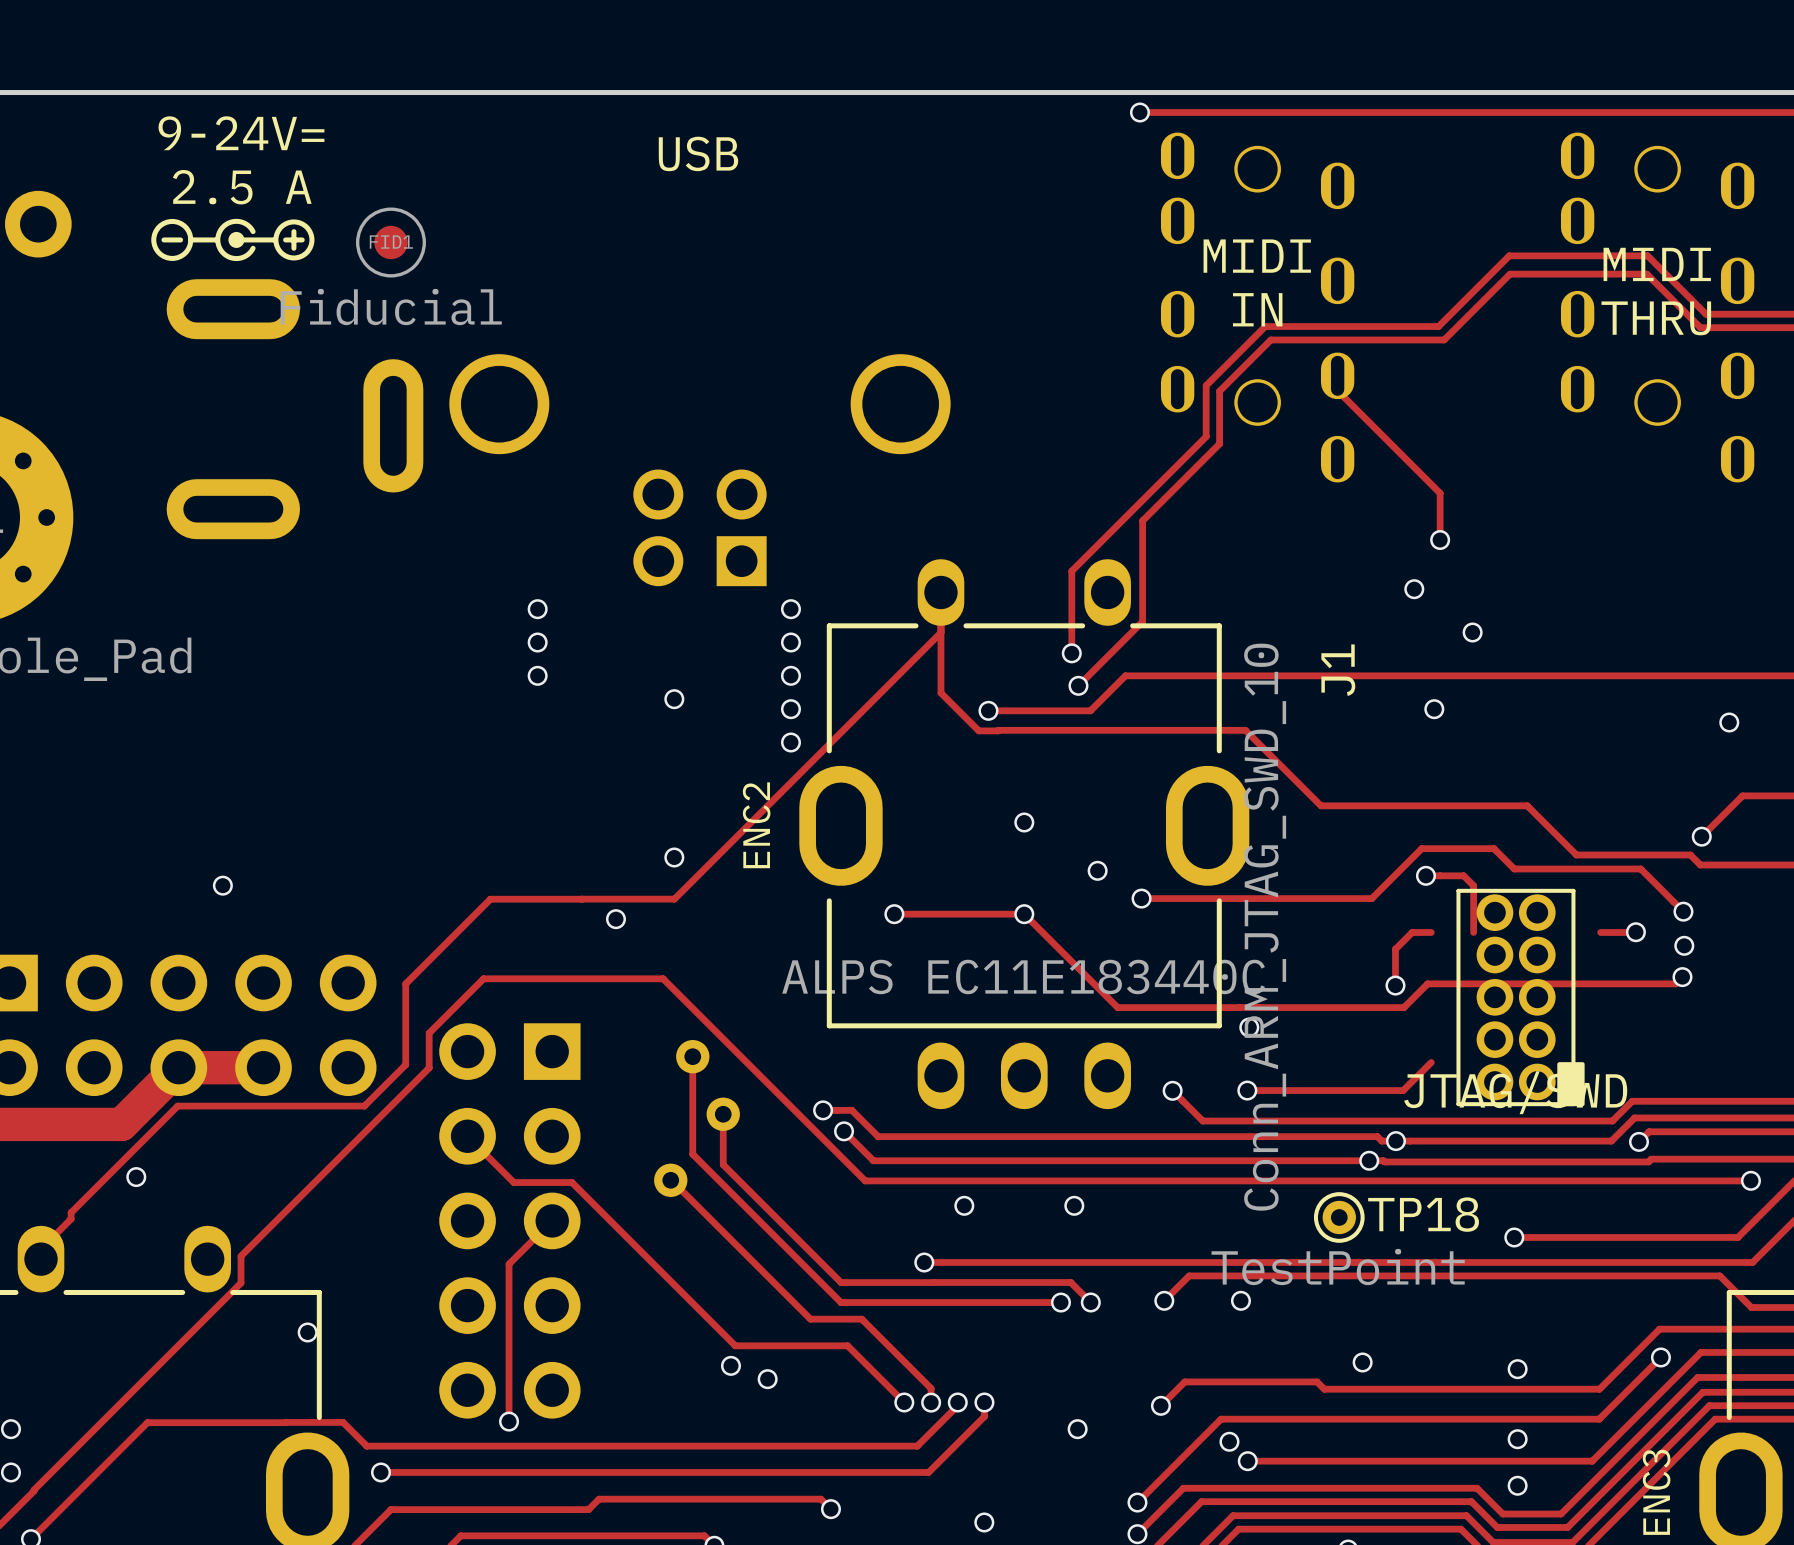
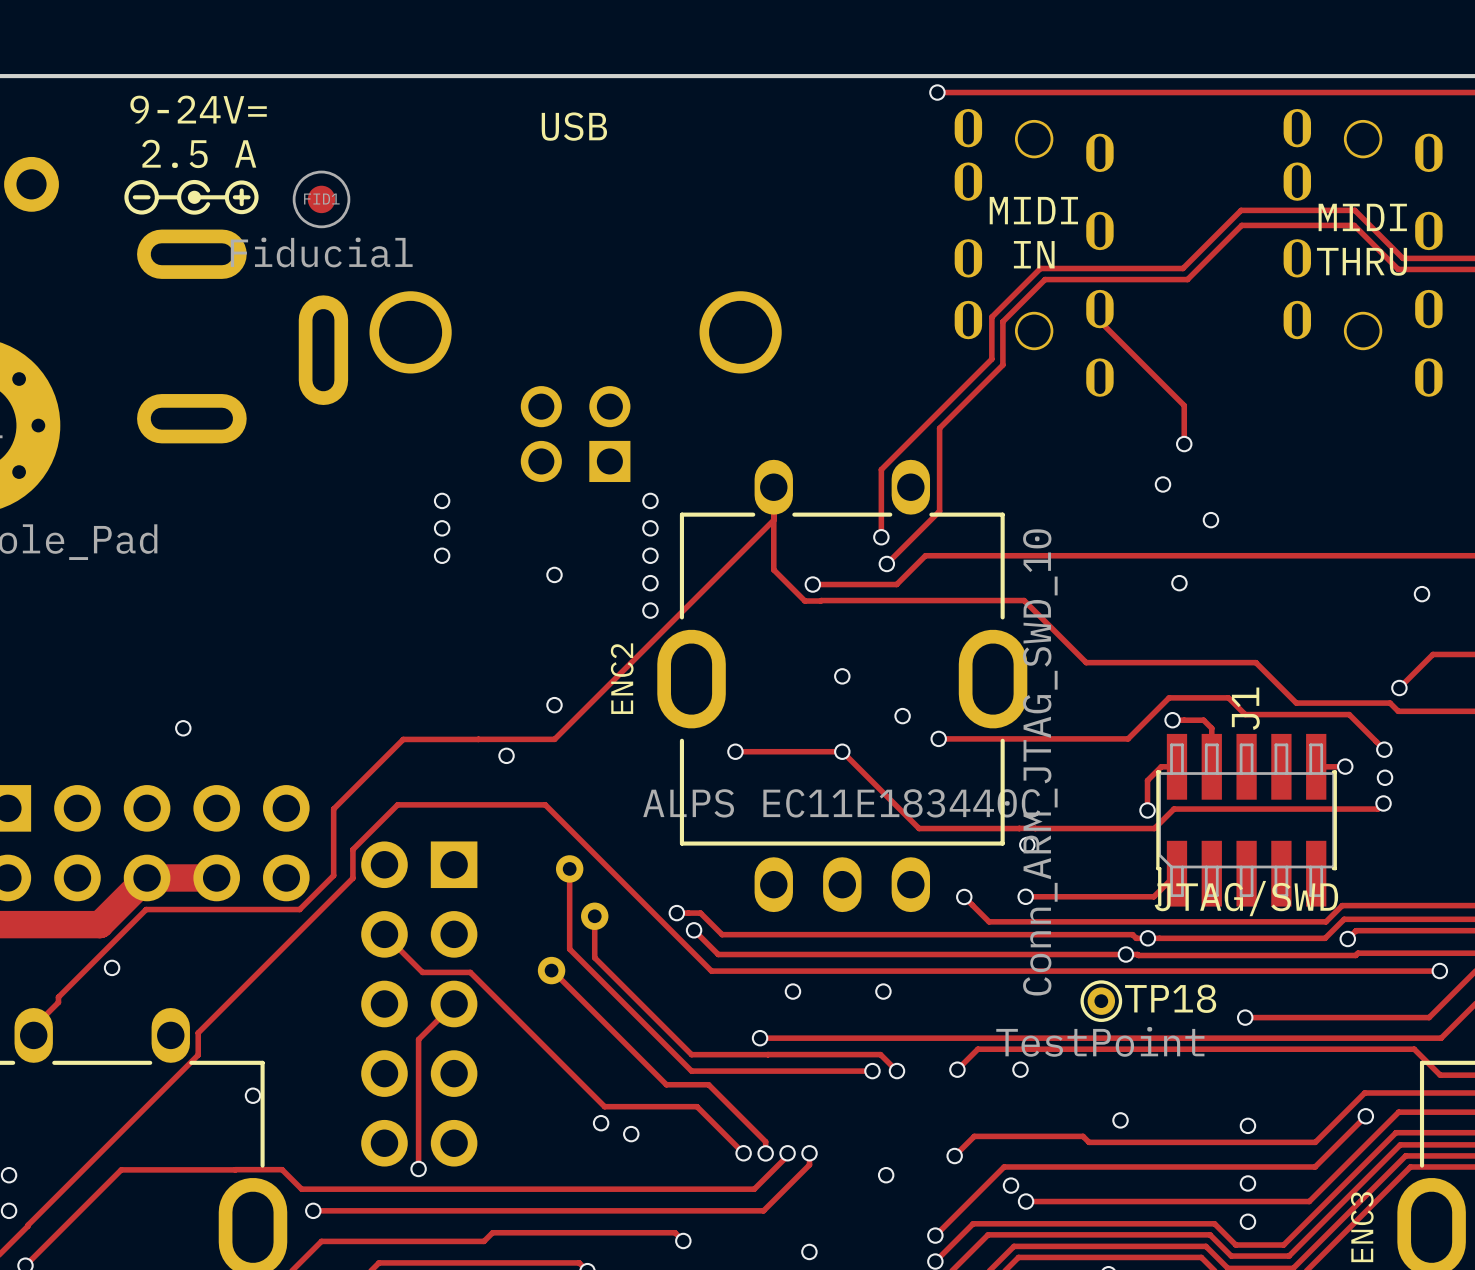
J1 name position: J1 (1338, 670) -> J1 (1245, 708)
J1 footprint: [1456, 888, 1585, 1107] -> [1156, 733, 1337, 907]

